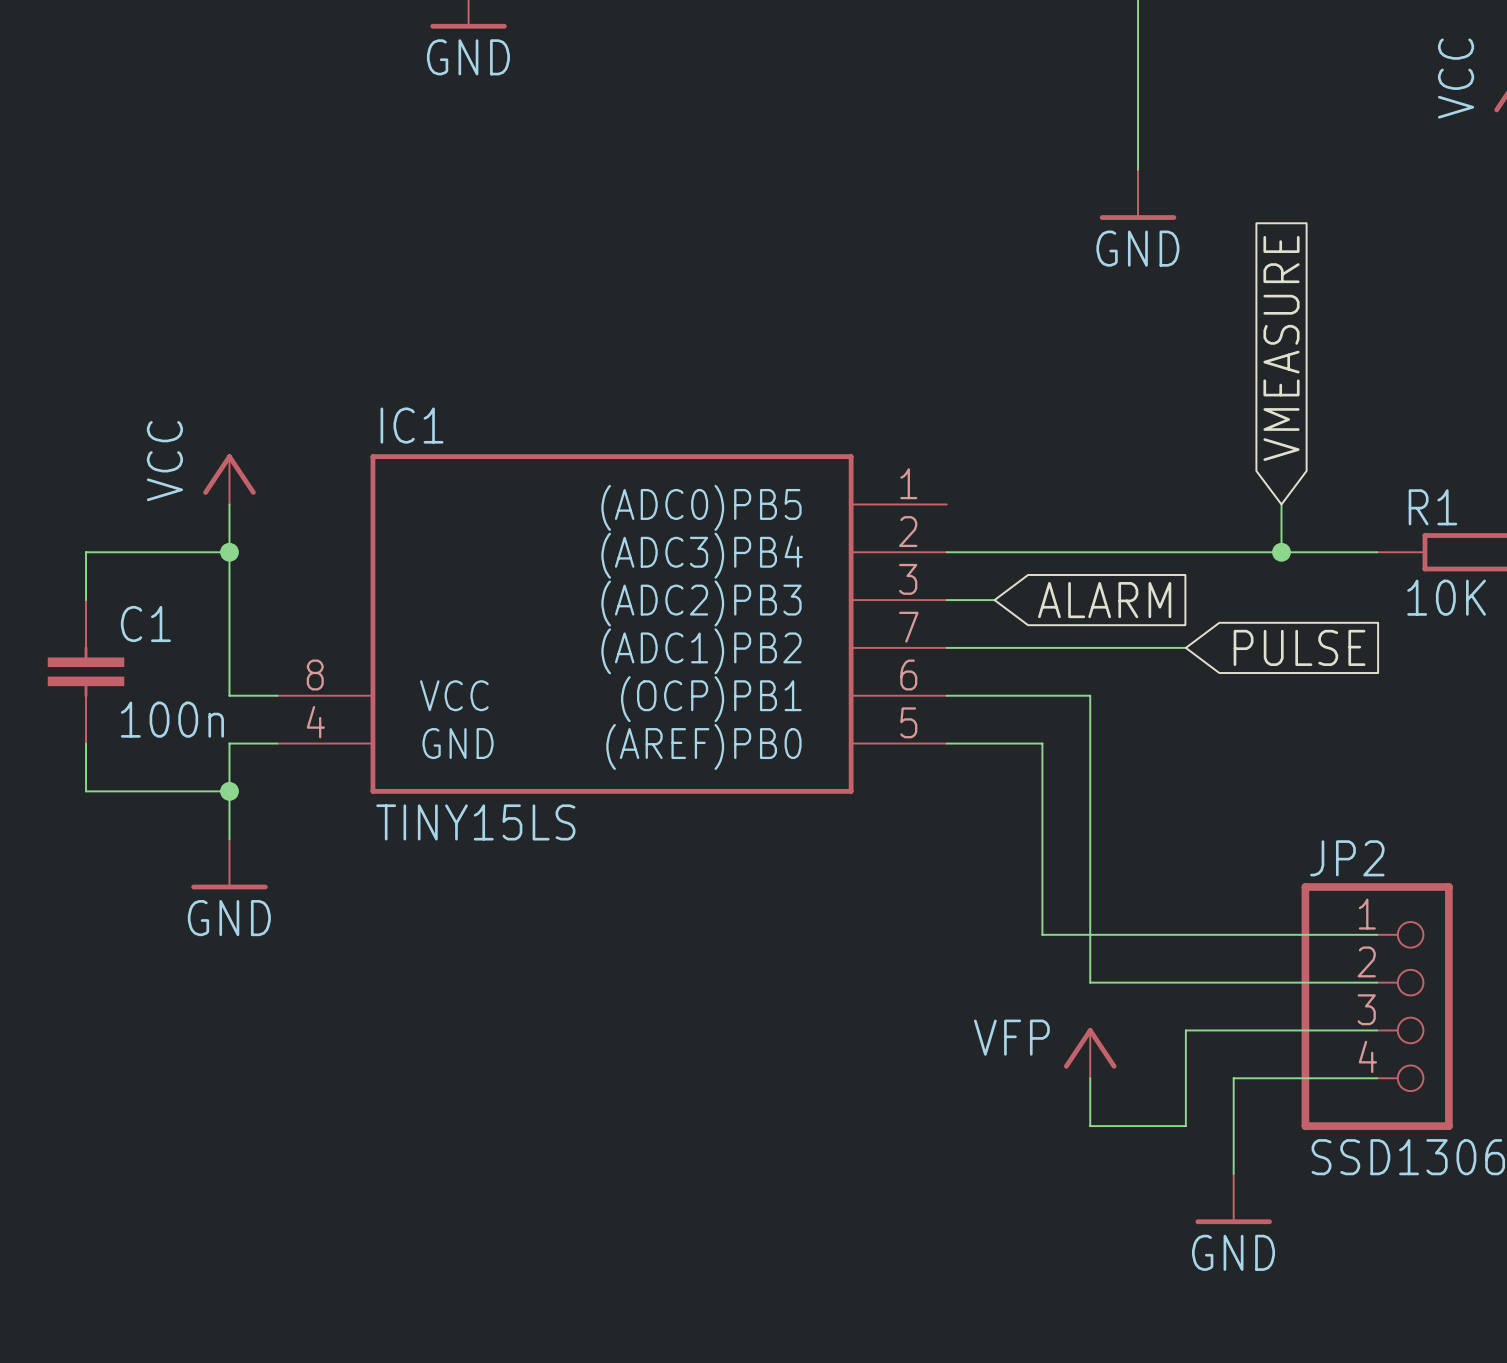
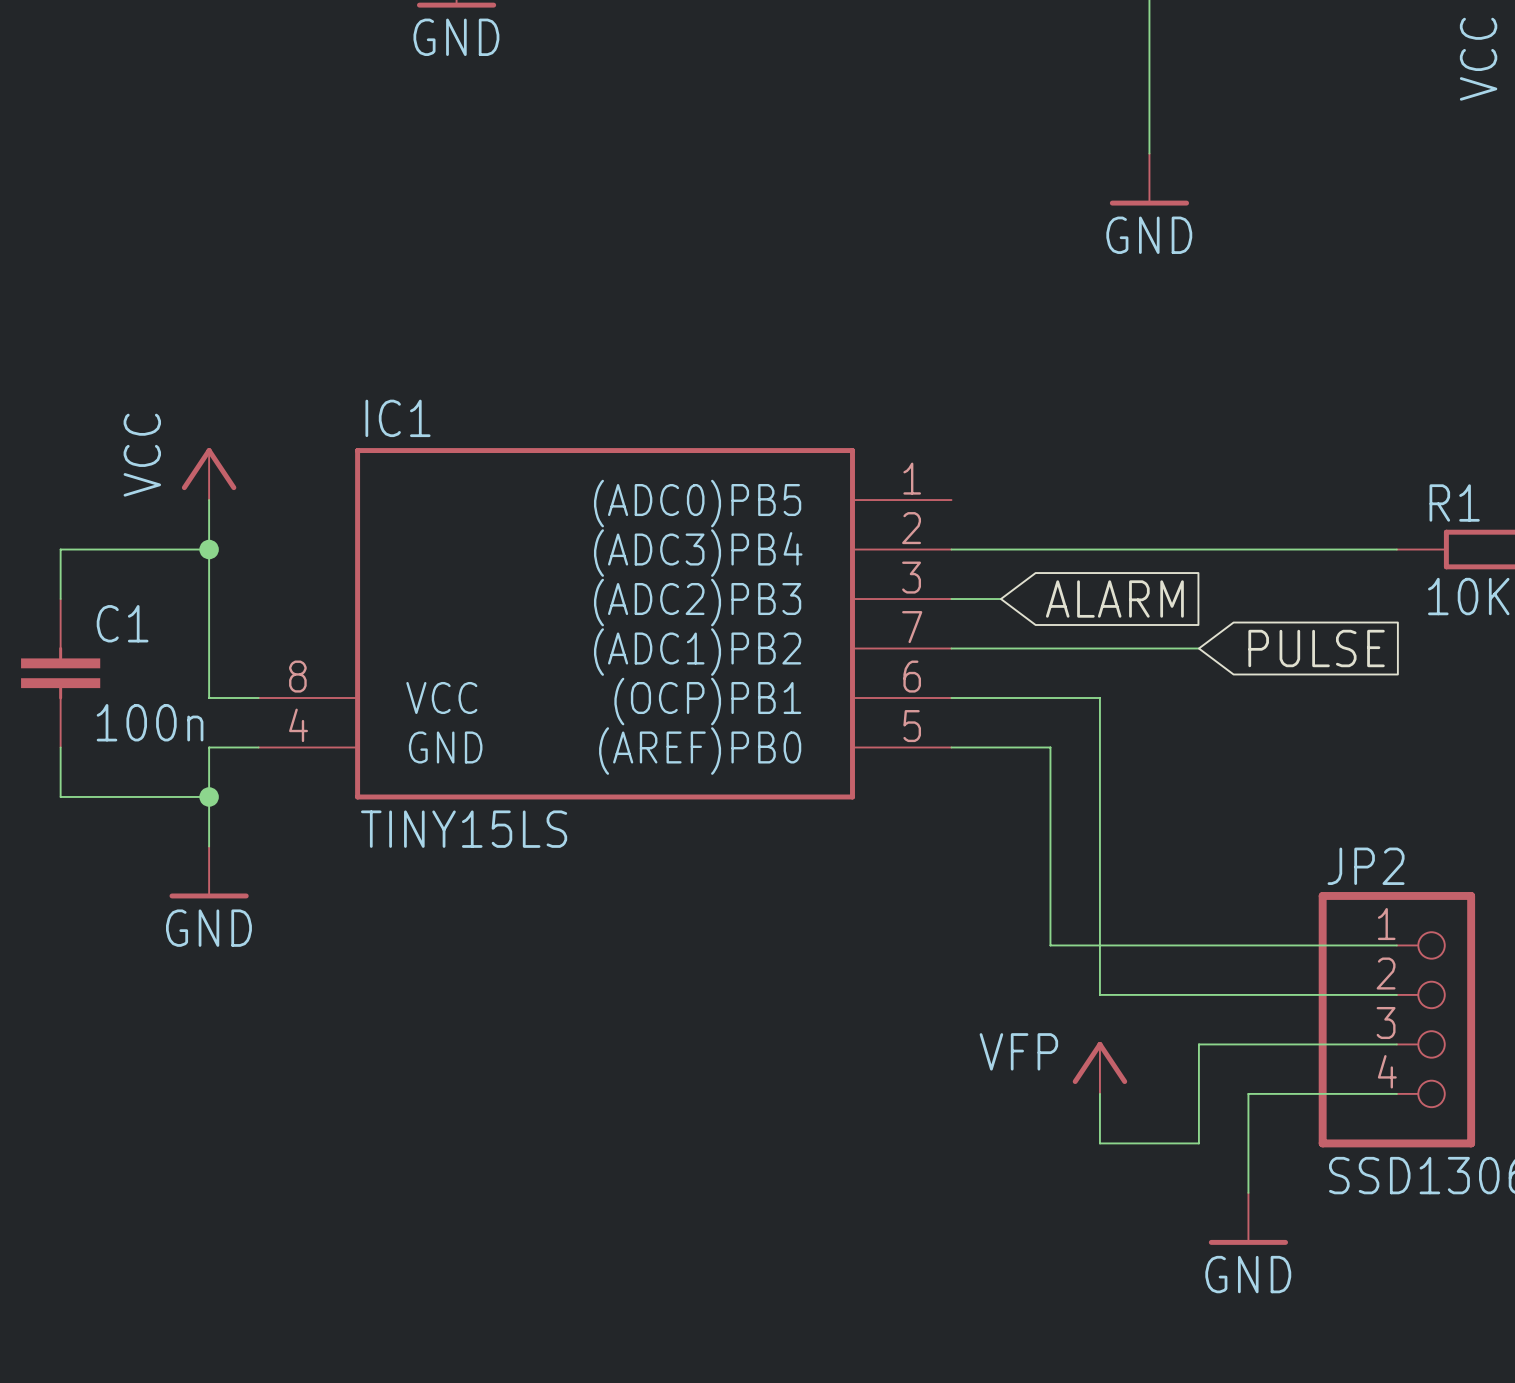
global label: VMEASURE (1281, 348) -> none
wire: (1281, 504) (1281, 552) -> none
junction: (1281, 552) -> none

